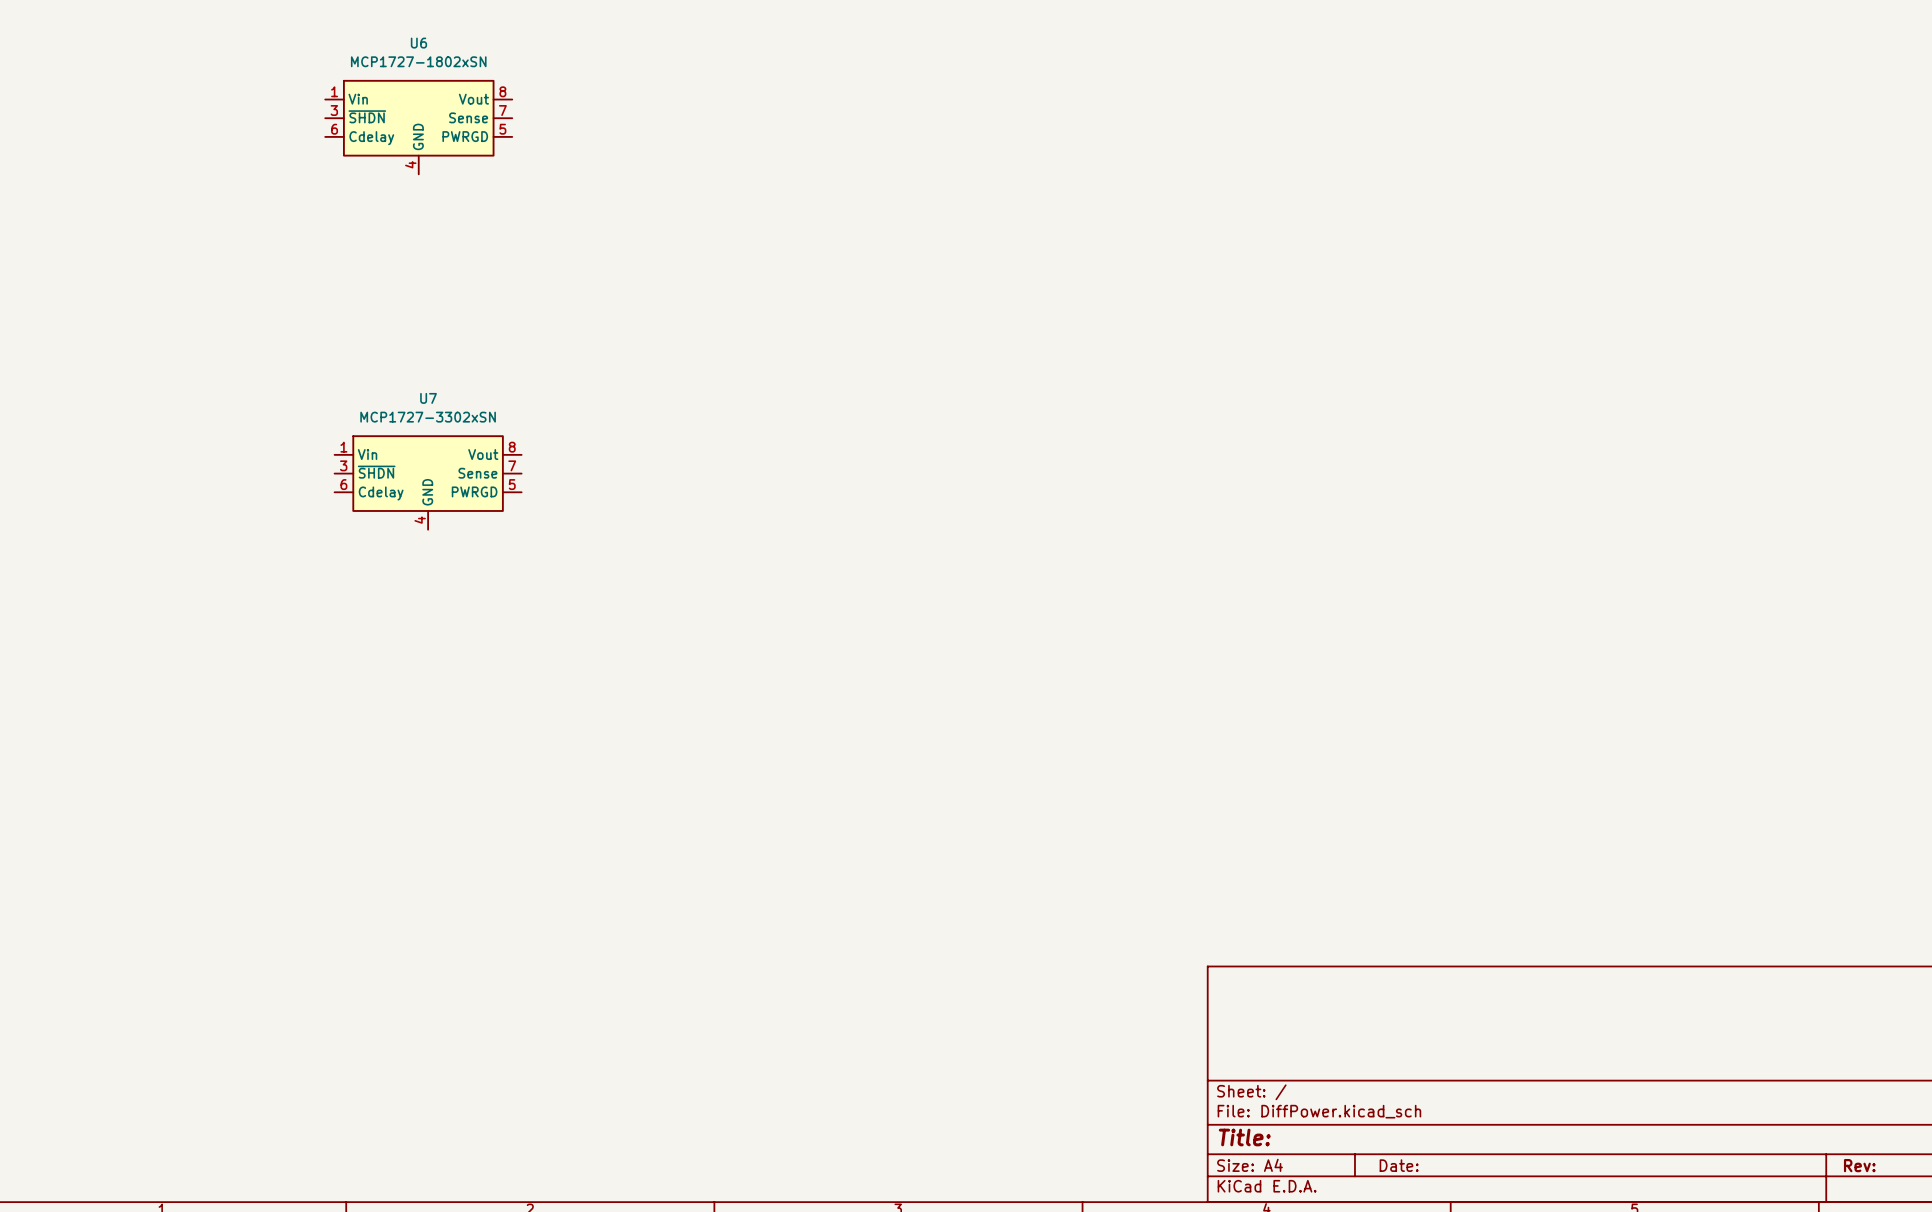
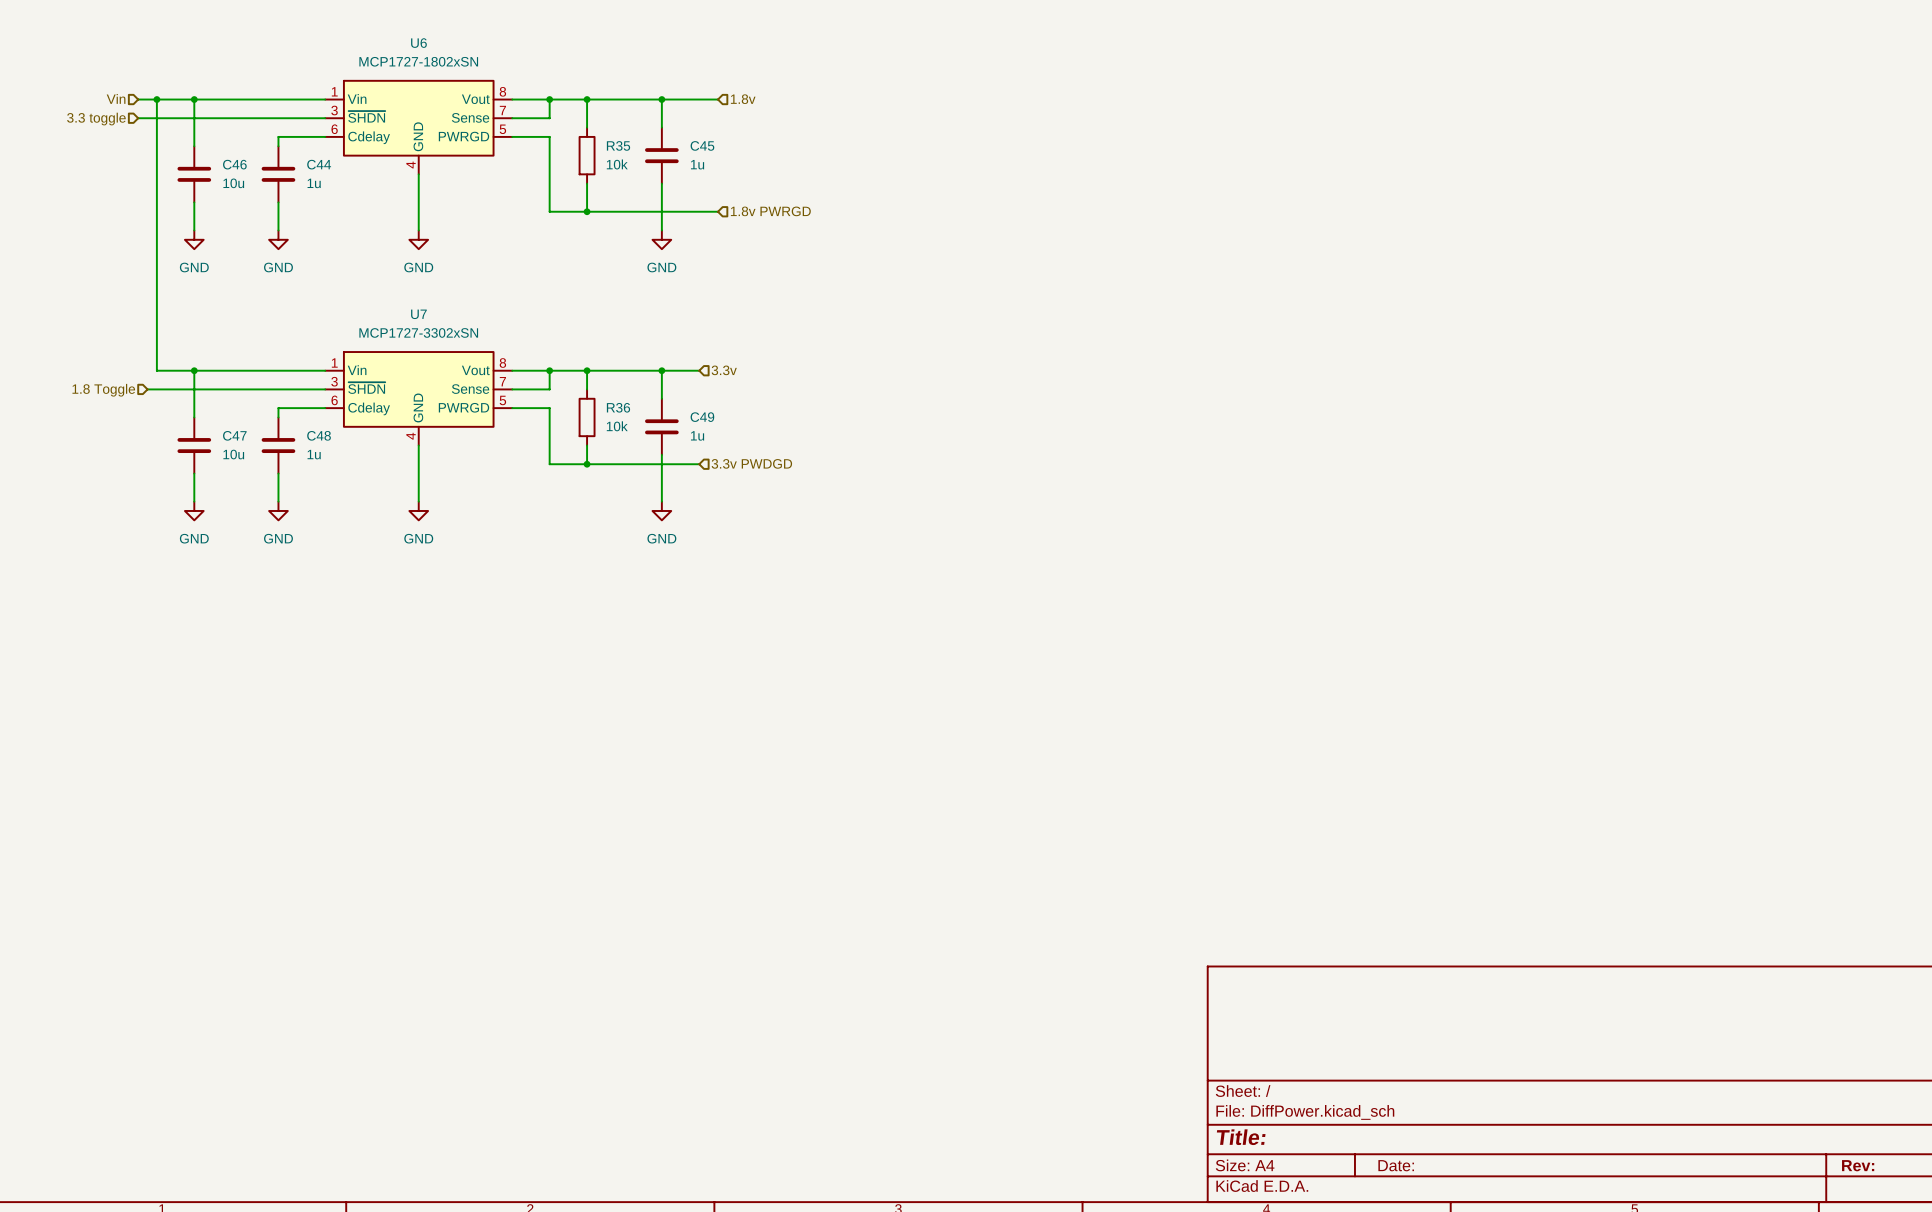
hierarchical label: none -> Vin (116, 98)
wire: none -> (138, 99) (325, 99)
wire: none -> (156, 99) (156, 370) (325, 370)
junction: none -> (156, 99)
wire: none -> (194, 99) (194, 146)
junction: none -> (194, 99)
wire: none -> (512, 99) (717, 99)
wire: none -> (549, 99) (549, 118) (512, 118)
junction: none -> (549, 99)
wire: none -> (587, 99) (587, 127)
junction: none -> (587, 99)
wire: none -> (661, 99) (661, 127)
junction: none -> (661, 99)
hierarchical label: none -> 1.8v (743, 99)
wire: none -> (138, 118) (325, 118)
hierarchical label: none -> 3.3 toggle (96, 119)
wire: none -> (325, 136) (278, 136) (278, 146)
wire: none -> (512, 136) (549, 136) (549, 211) (717, 211)
R35: none -> 10k (587, 155)
C45: none -> 1u (661, 155)
C46: none -> 10u (194, 174)
C44: none -> 1u (278, 174)
wire: none -> (418, 174) (418, 230)
wire: none -> (587, 183) (587, 211)
wire: none -> (661, 183) (661, 230)
wire: none -> (194, 202) (194, 230)
wire: none -> (278, 202) (278, 230)
junction: none -> (587, 211)
hierarchical label: none -> 1.8v PWRGD (770, 211)
power symbol: none -> GND (194, 239)
power symbol: none -> GND (278, 239)
power symbol: none -> GND (418, 239)
power symbol: none -> GND (661, 239)
wire: none -> (194, 370) (194, 417)
junction: none -> (194, 370)
wire: none -> (512, 370) (699, 370)
wire: none -> (549, 370) (549, 389) (512, 389)
junction: none -> (549, 370)
wire: none -> (587, 370) (587, 389)
junction: none -> (587, 370)
wire: none -> (661, 370) (661, 398)
junction: none -> (661, 370)
hierarchical label: none -> 3.3v (724, 370)
wire: none -> (147, 389) (325, 389)
hierarchical label: none -> 1.8 Toggle (103, 390)
wire: none -> (325, 408) (278, 408) (278, 417)
wire: none -> (512, 408) (549, 408) (549, 464) (699, 464)
R36: none -> 10k (587, 417)
C49: none -> 1u (661, 426)
C47: none -> 10u (194, 445)
C48: none -> 1u (278, 445)
wire: none -> (587, 445) (587, 464)
wire: none -> (661, 454) (661, 501)
hierarchical label: none -> 3.3v PWDGD (751, 463)
junction: none -> (587, 464)
wire: none -> (194, 473) (194, 501)
wire: none -> (278, 473) (278, 501)
U7 position: (428, 482) -> (418, 398)
power symbol: none -> GND (194, 510)
power symbol: none -> GND (278, 510)
power symbol: none -> GND (418, 510)
power symbol: none -> GND (661, 510)

